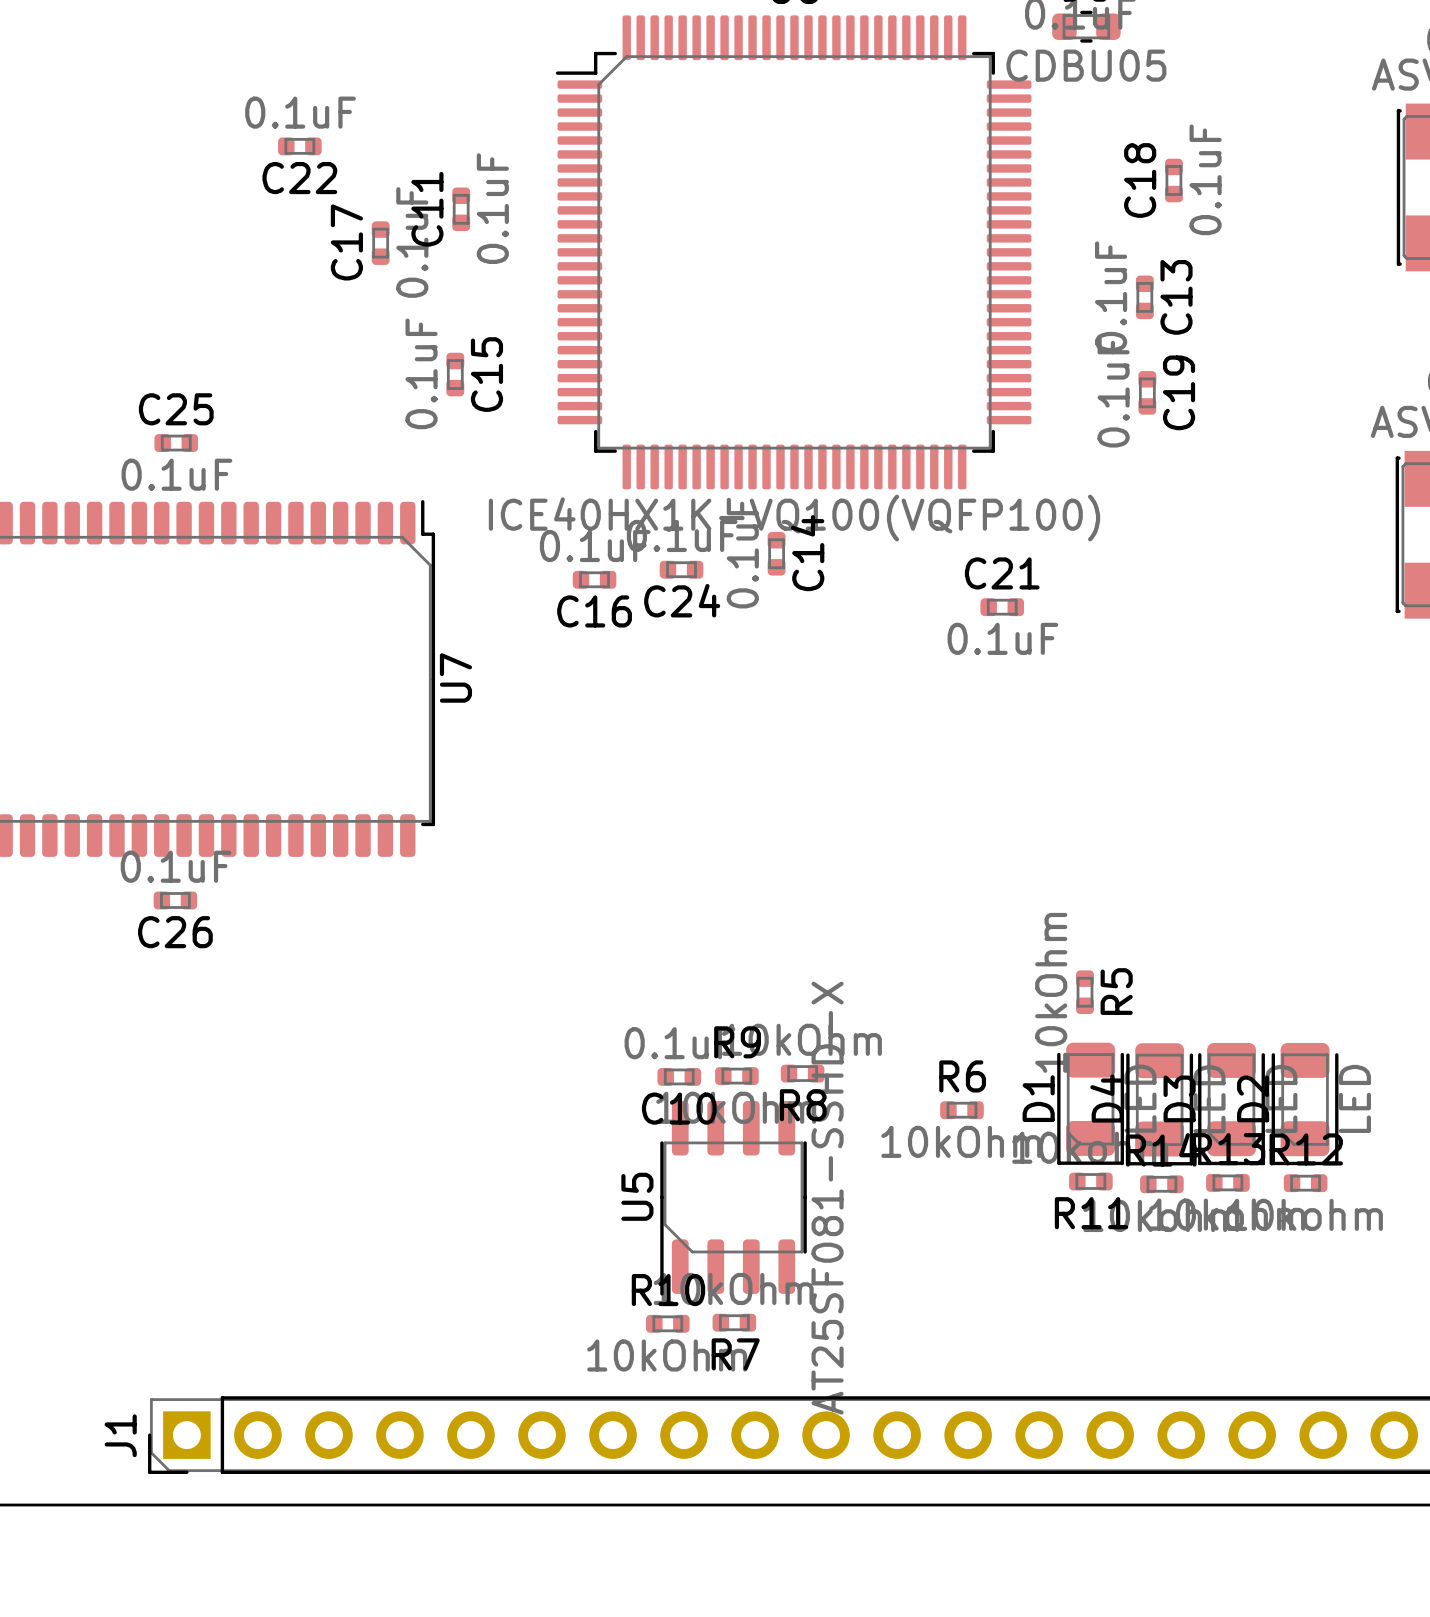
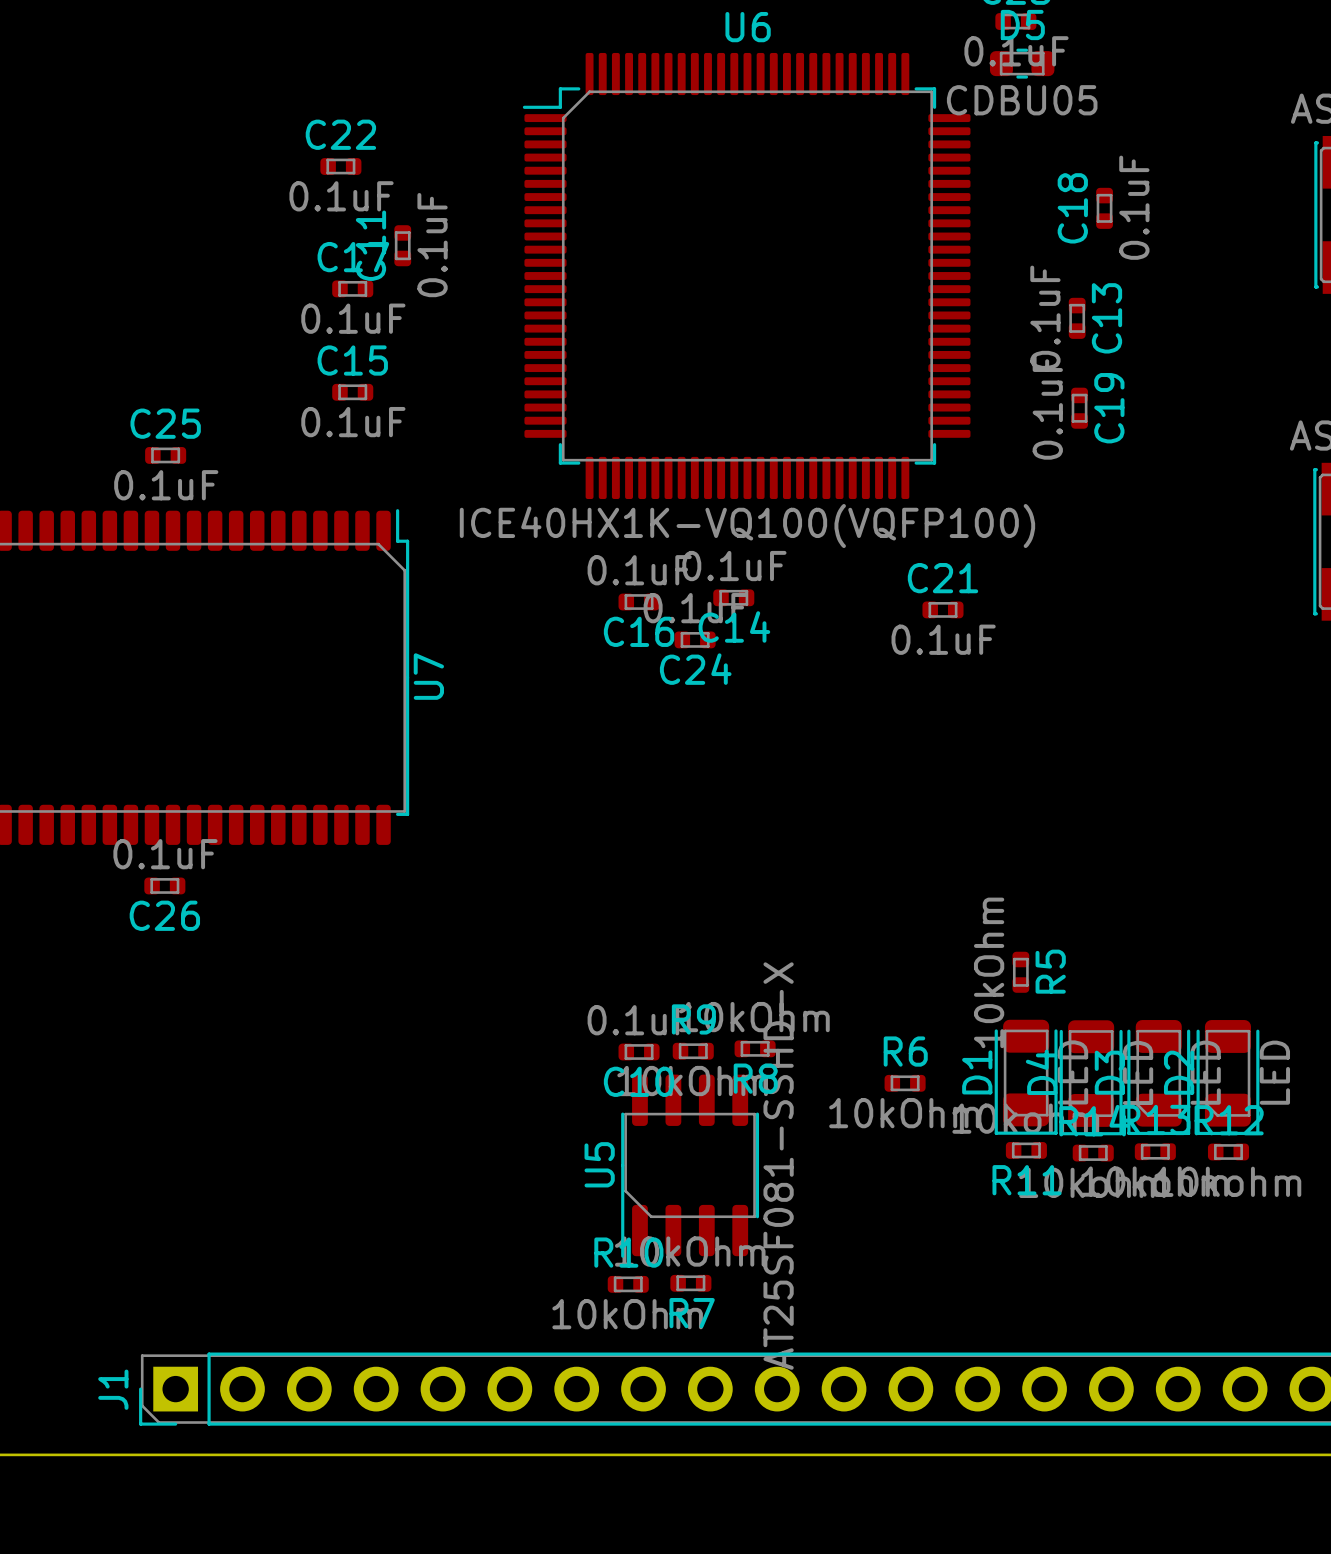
C22 value position: 0.1uF (300, 112) -> 0.1uF (341, 196)
C22 position: (299, 146) -> (340, 166)
C22 name position: C22 (299, 178) -> C22 (340, 134)
C11 position: (461, 209) -> (402, 245)
C17 rotation: 0° (380, 243) -> 90° clockwise (352, 288)
C15 rotation: 0° (455, 374) -> 90° clockwise (352, 392)
C15 position: (455, 374) -> (352, 392)
C14 rotation: 0° (776, 553) -> 90° clockwise (733, 597)
C14 position: (776, 553) -> (733, 597)
C24 position: (681, 569) -> (695, 639)
C16 position: (594, 579) -> (639, 602)

